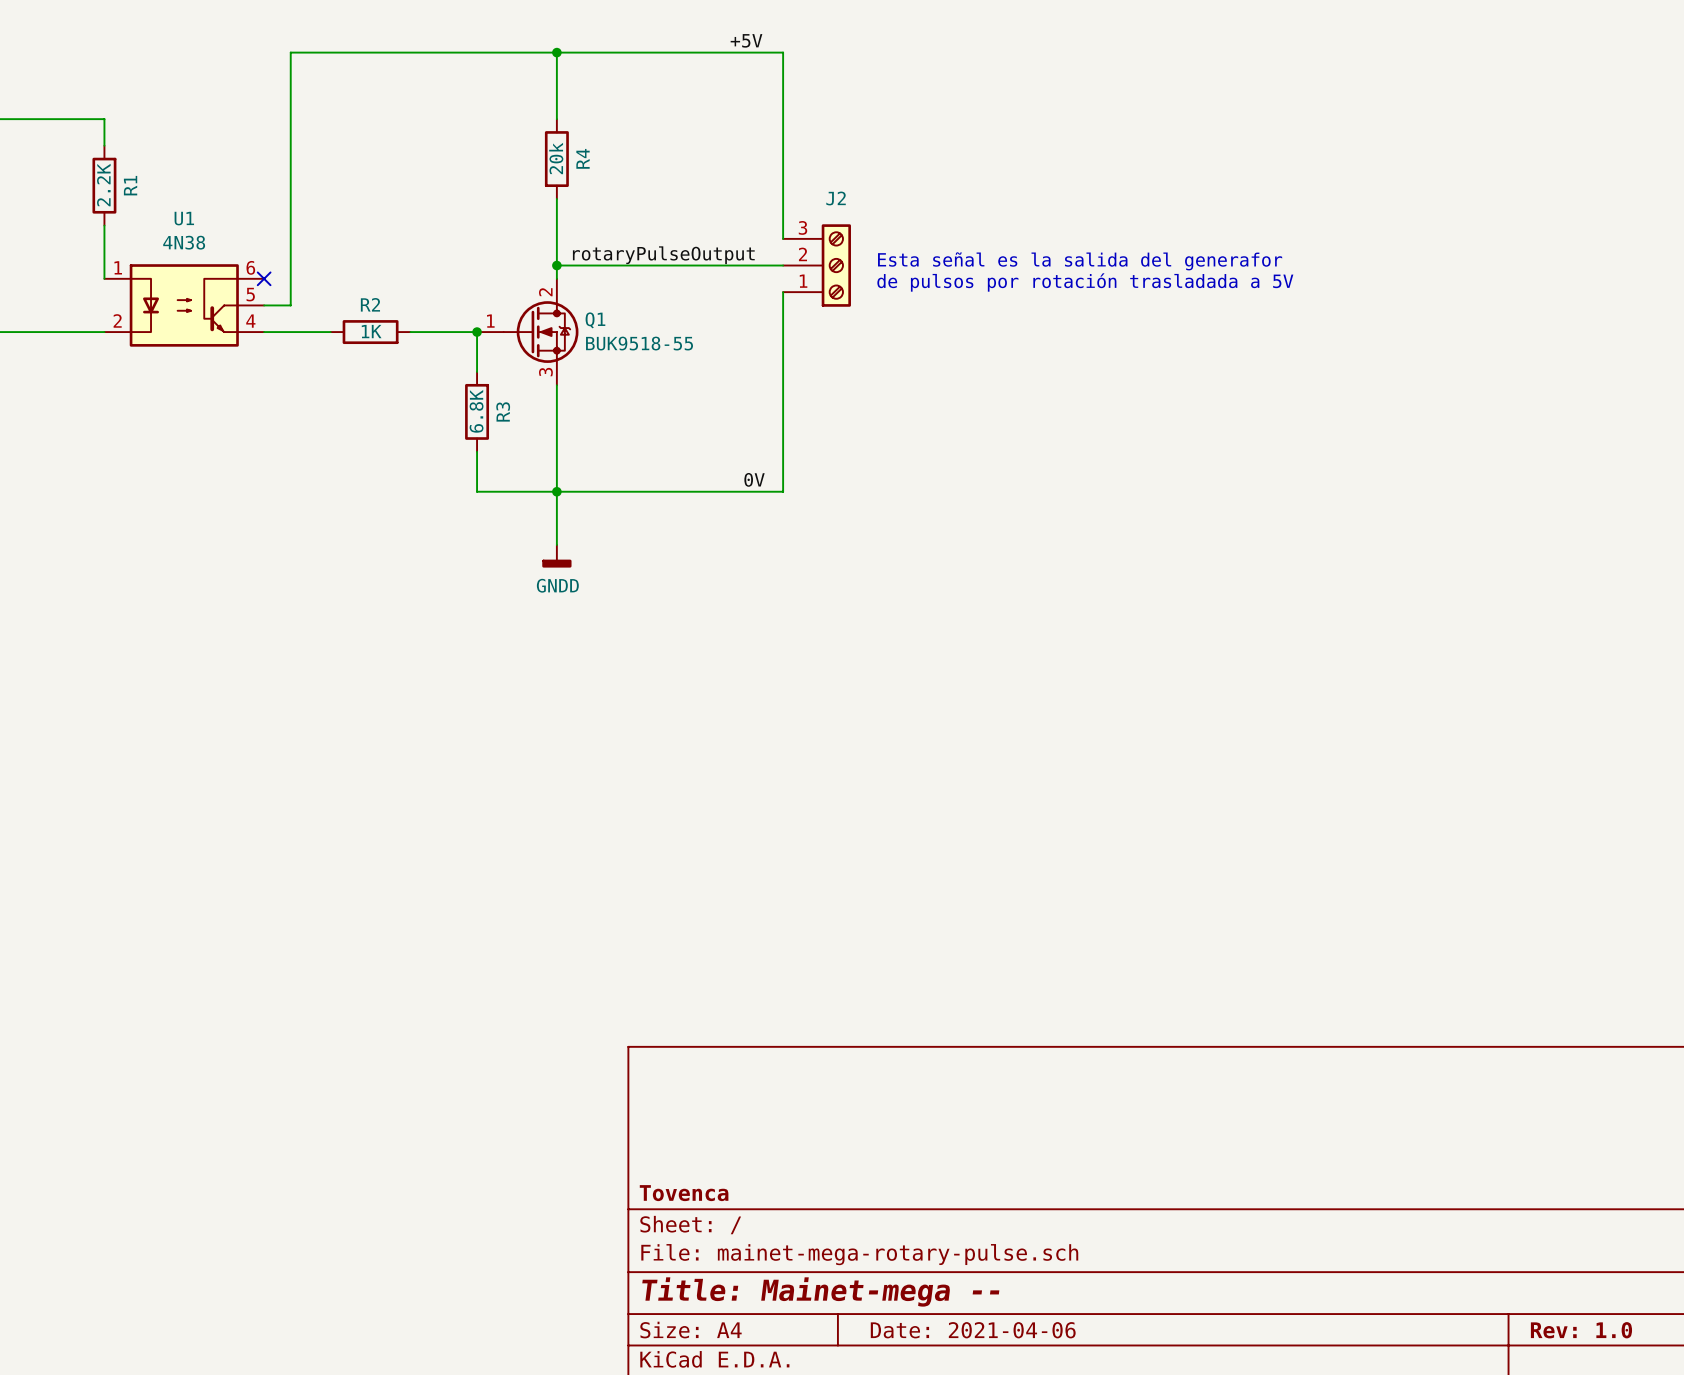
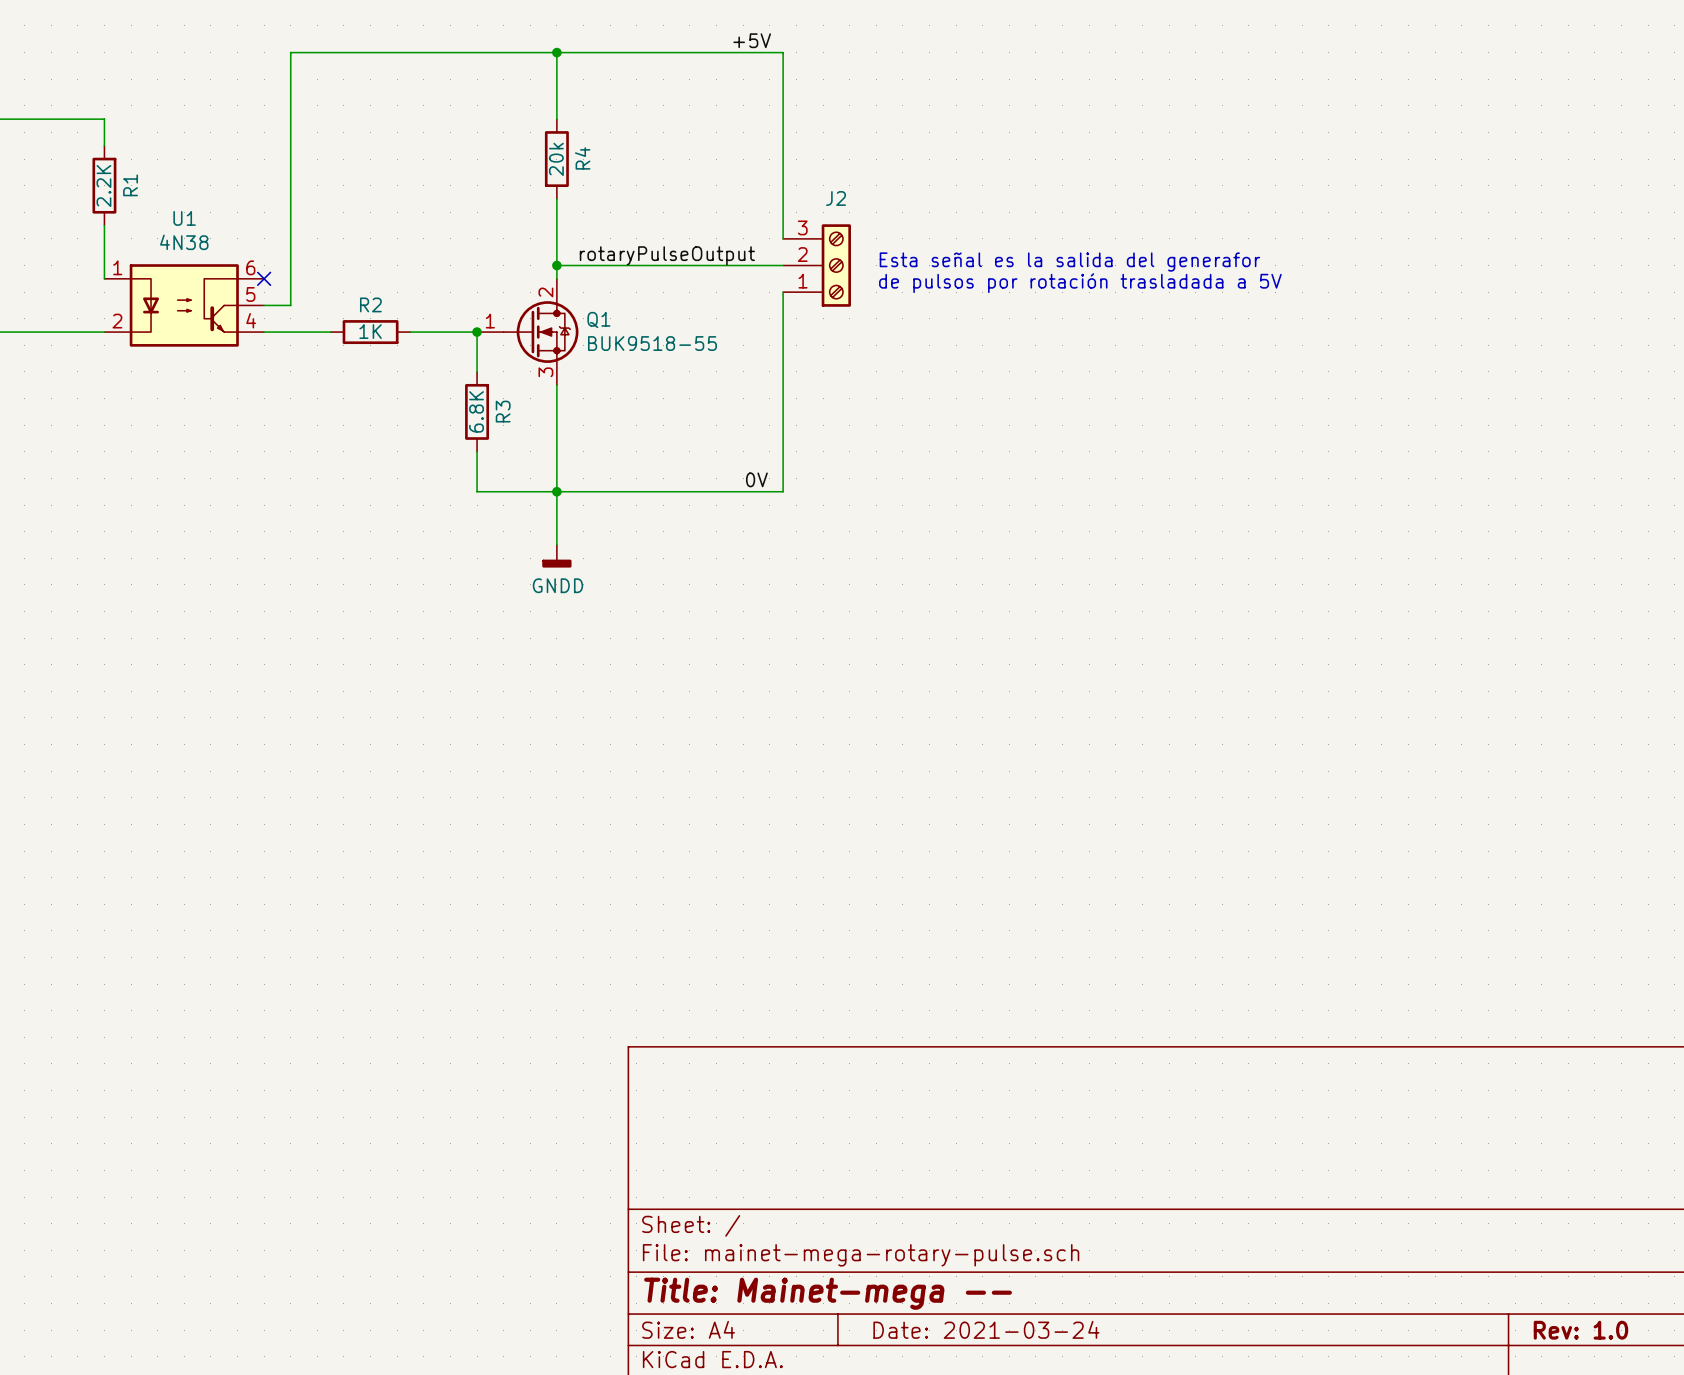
title block: Tovenca (684, 1193) -> none
title block: Date: 2021-04-06 (973, 1330) -> Date: 2021-03-24 (986, 1329)

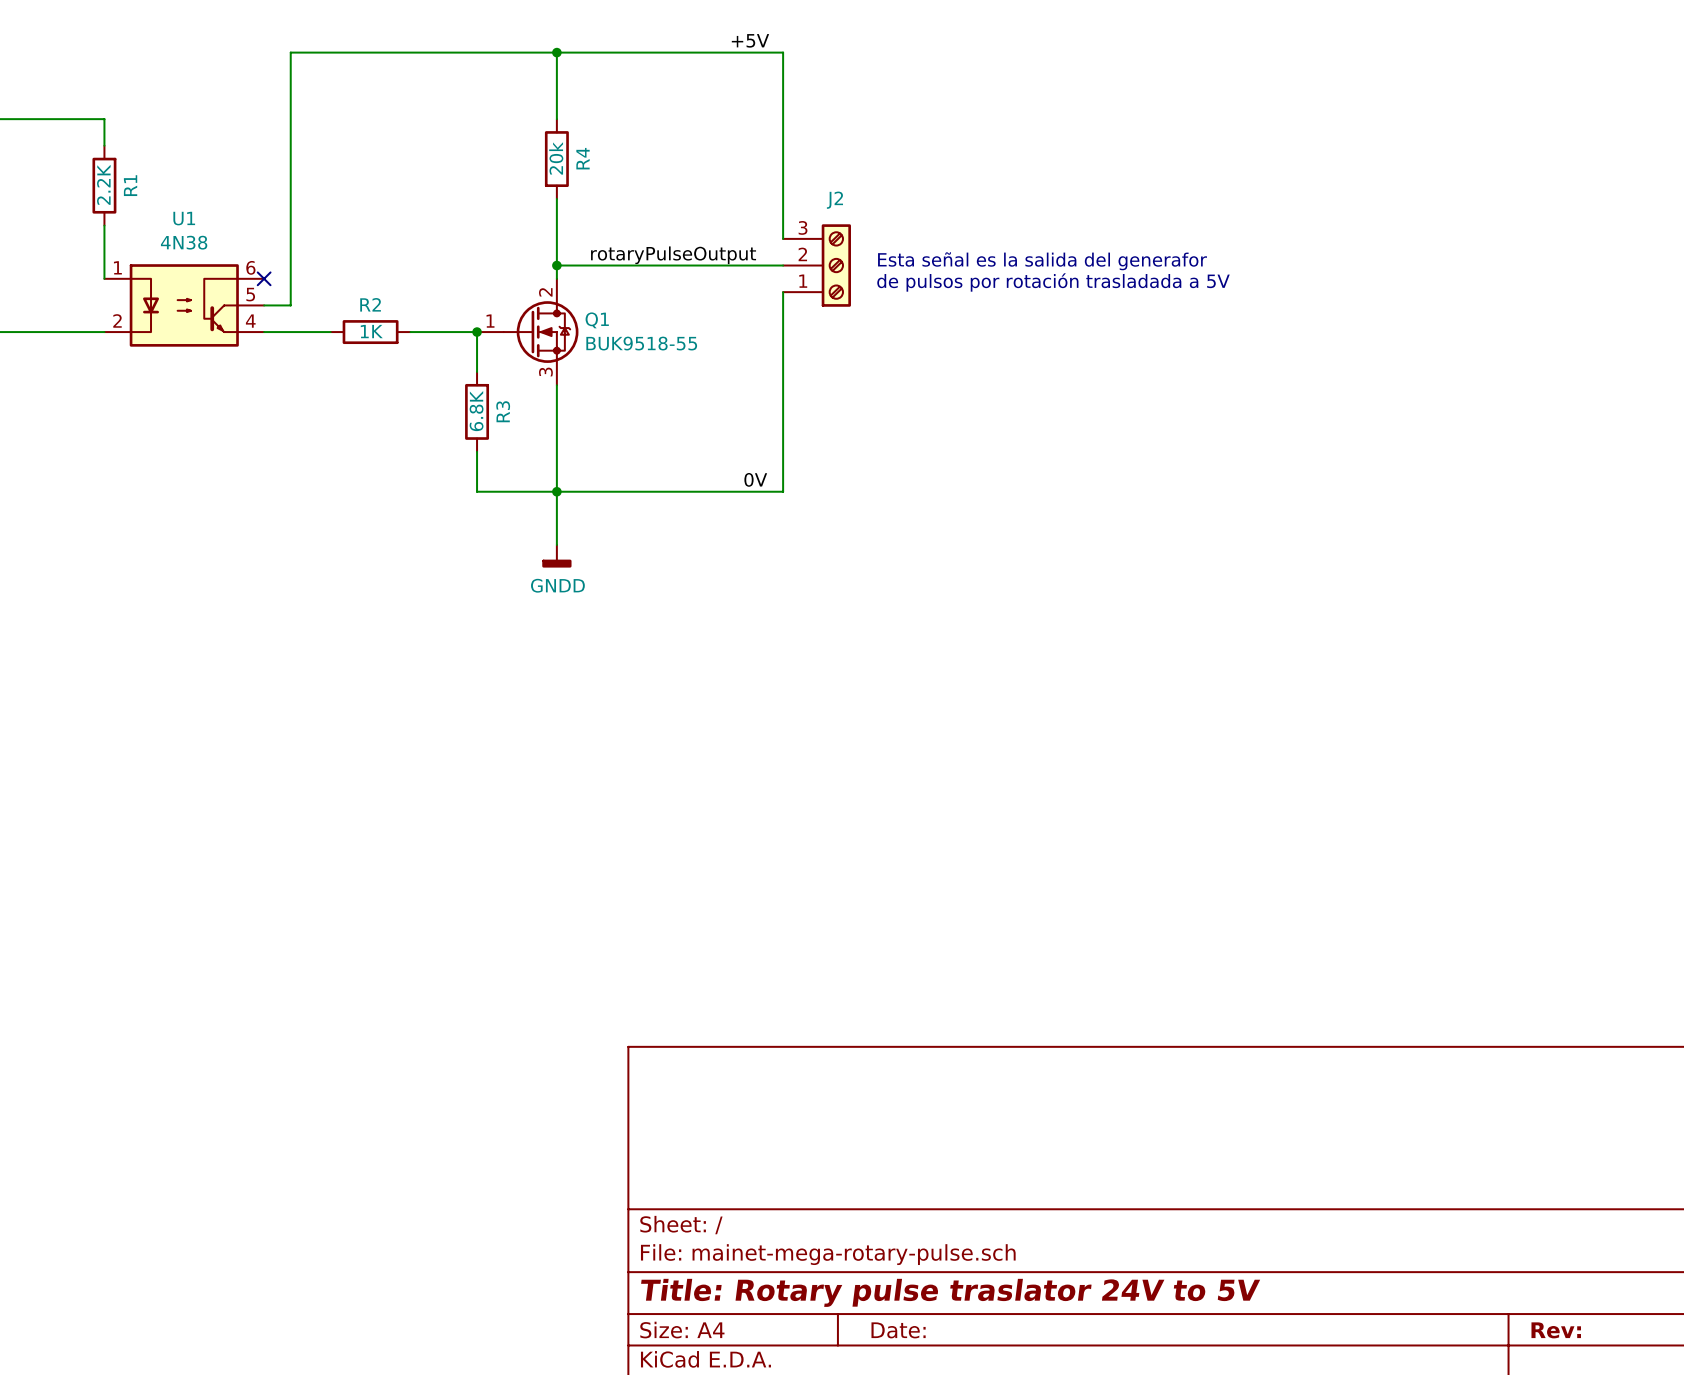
title block: Title: Mainet-mega -- (828, 1293) -> Title: Rotary pulse traslator 24V to 5V (950, 1292)
title block: Date: 2021-03-24 (986, 1329) -> Date: (898, 1330)
title block: Rev: 1.0 (1580, 1330) -> Rev: (1556, 1330)

